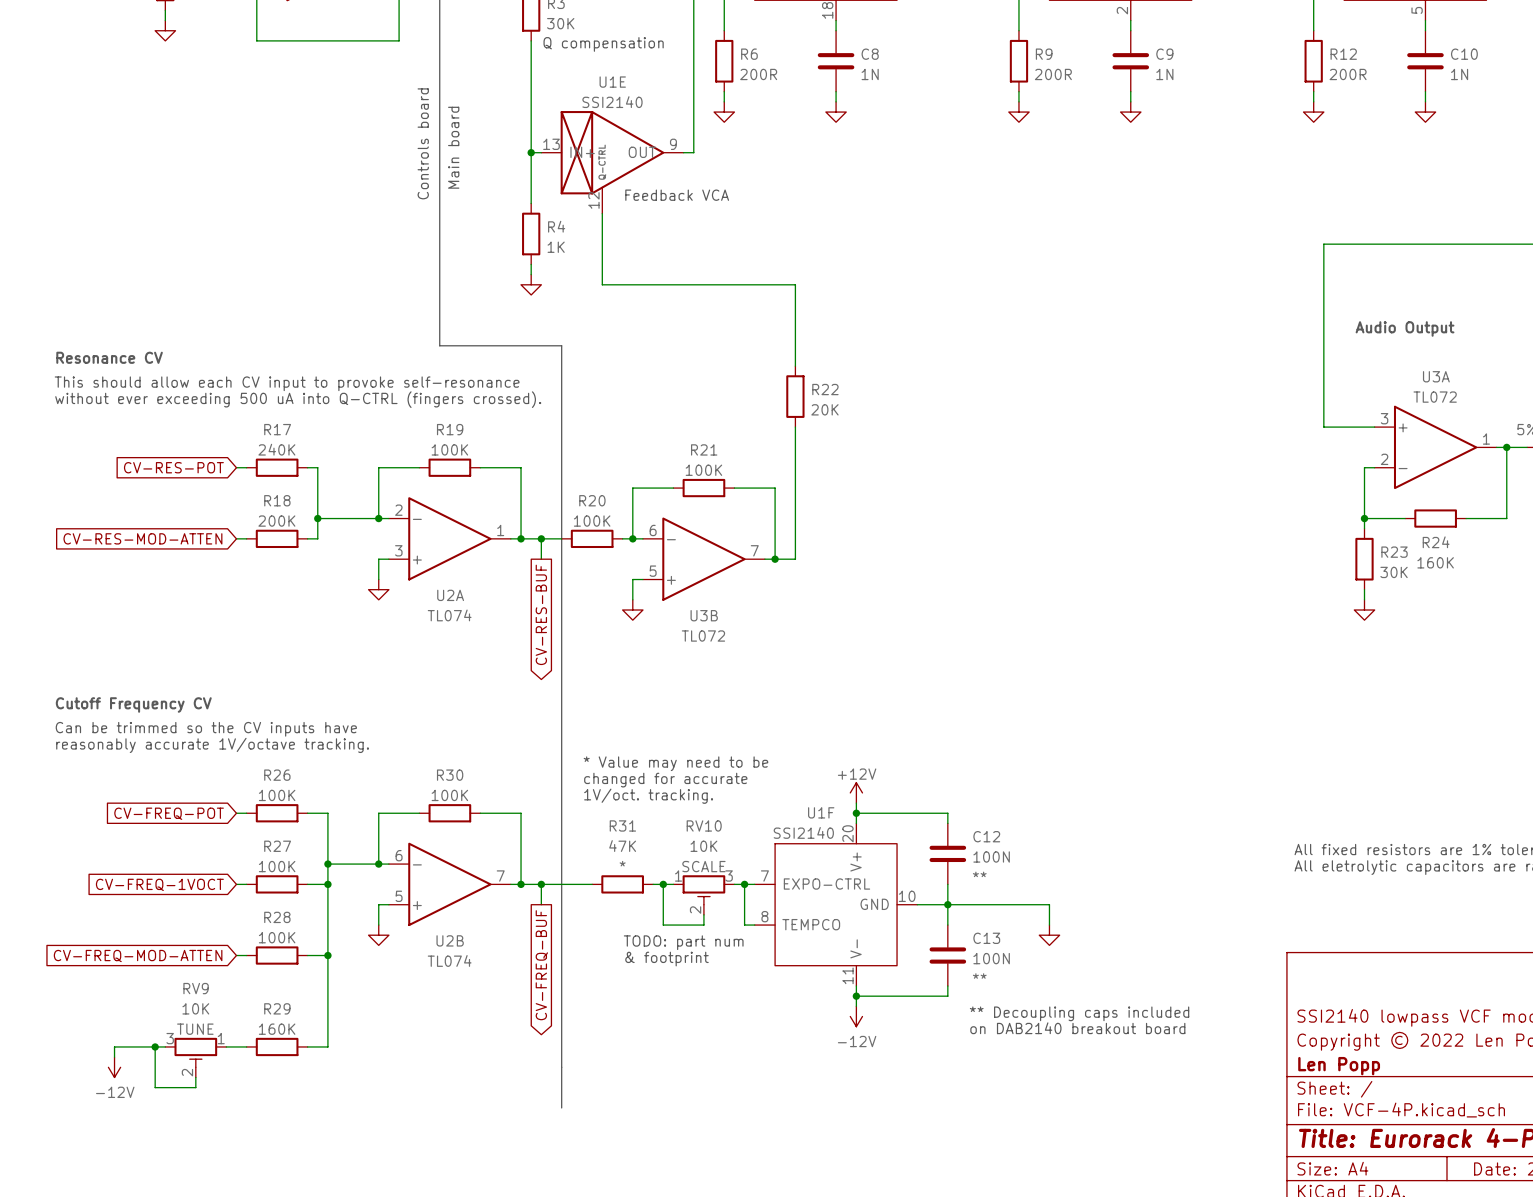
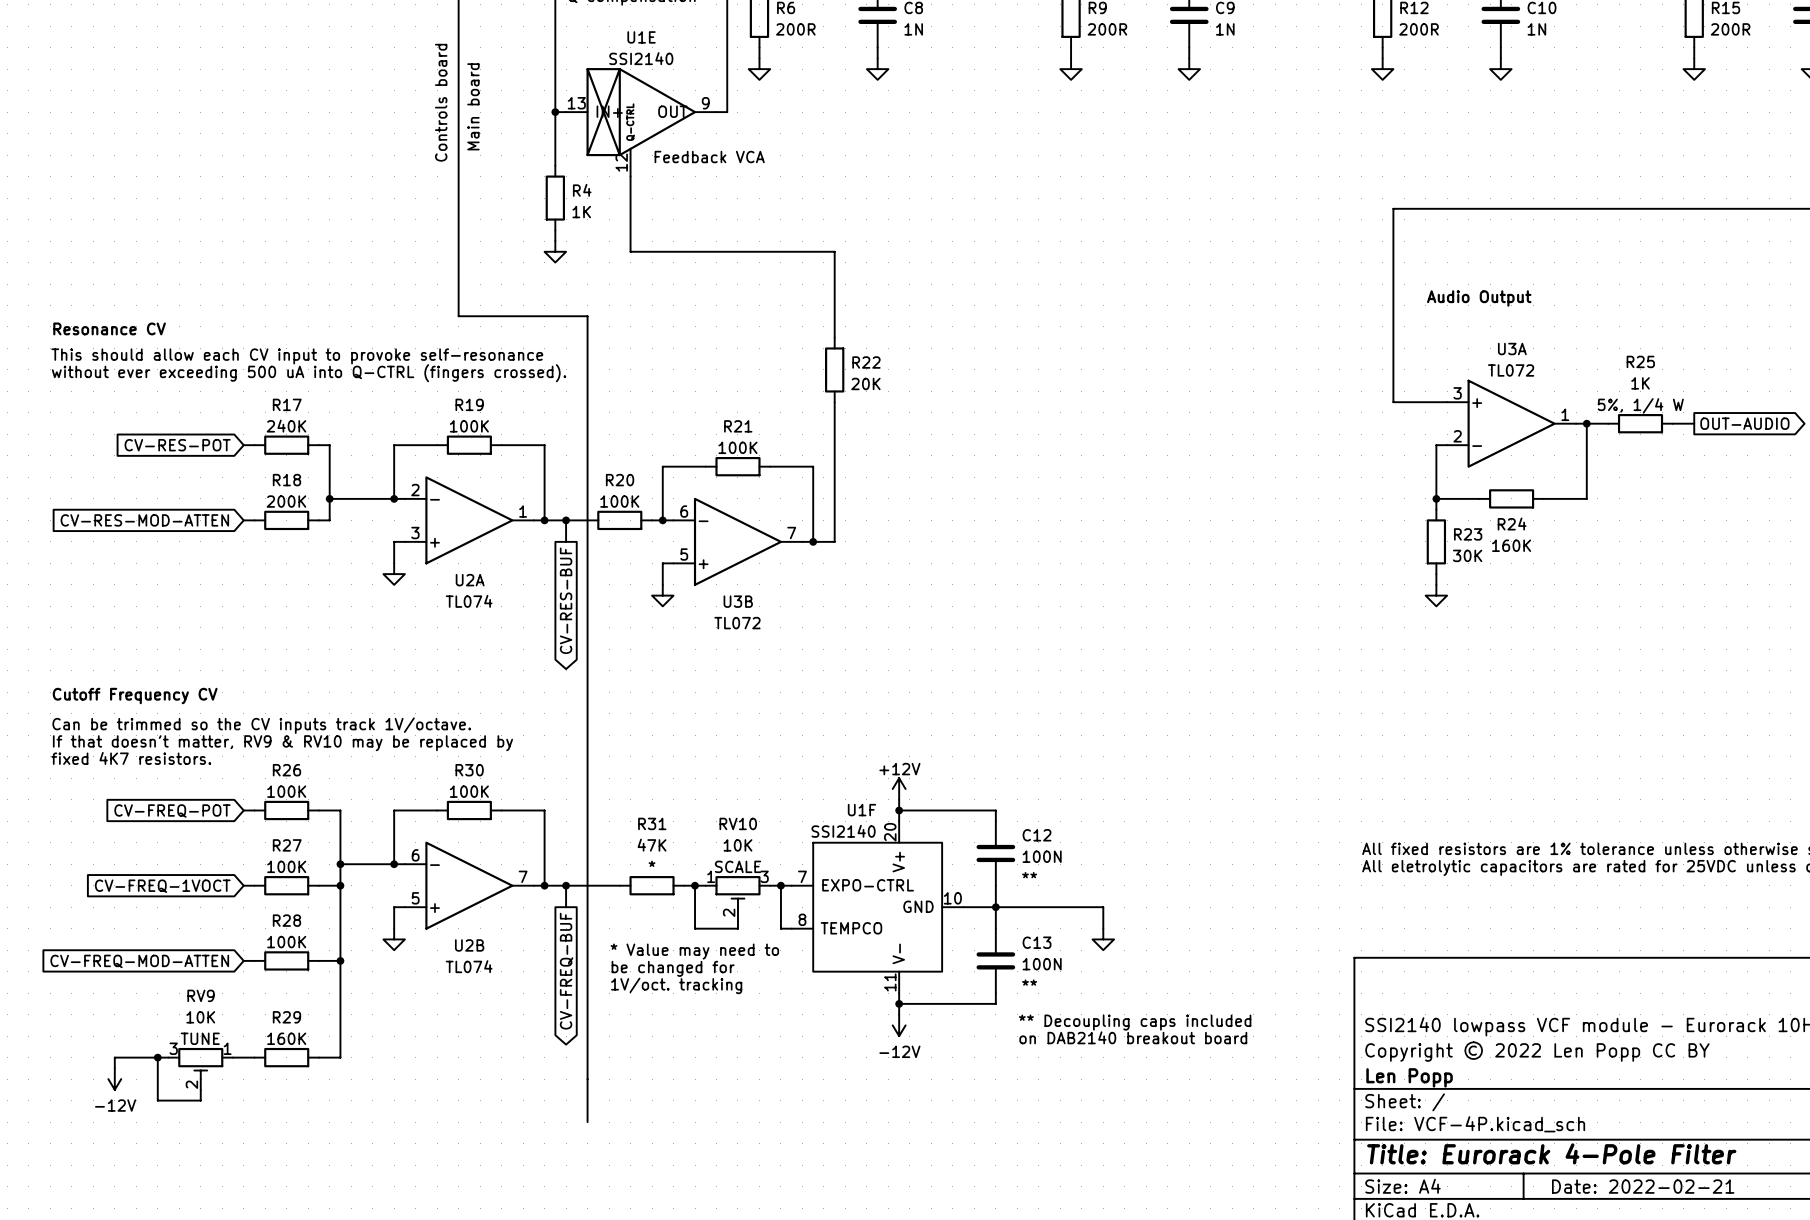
text: Can be trimmed so the CV inputs have (206, 729) -> Can be trimmed so the CV inputs track 1V/octave. (261, 725)
text: reasonably accurate 1V/octave tracking. (212, 745) -> If that doesn't matter, RV9 & RV10 may be replaced by (282, 743)
text: * Value may need to be (675, 763) -> none
text: none -> fixed 4K7 resistors. (131, 758)
text: changed for accurate (665, 780) -> none
text: 1V/oct. tracking. (648, 796) -> none
text: TODO: part num (683, 942) -> none
text: none -> * Value may need to (694, 951)
text: & footprint (667, 959) -> none
text: none -> be changed for (673, 968)
text: none -> 1V/oct. tracking (676, 985)

